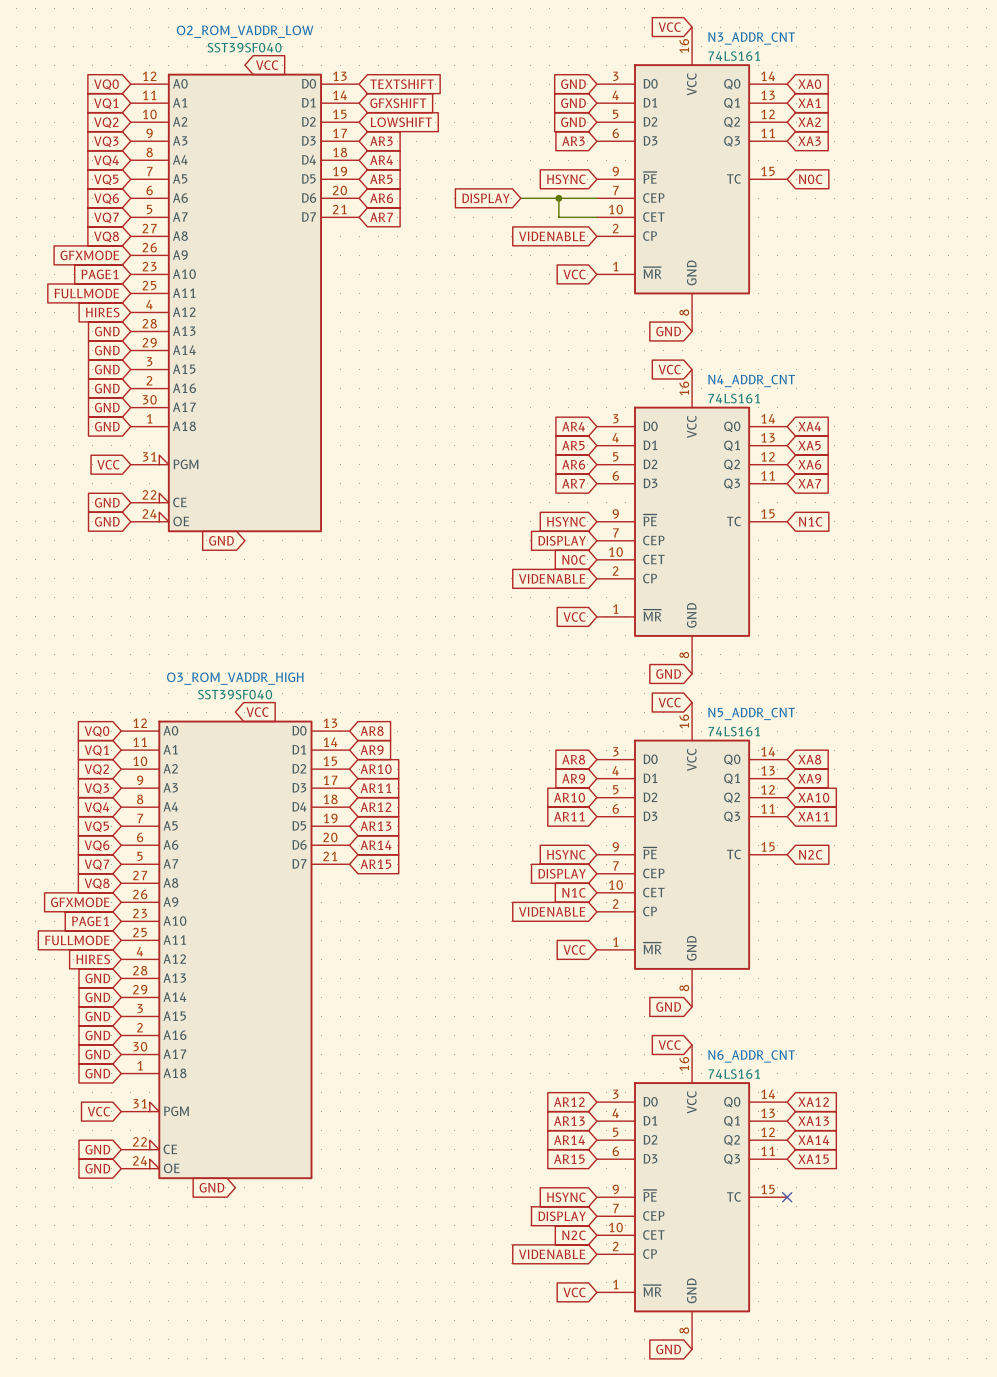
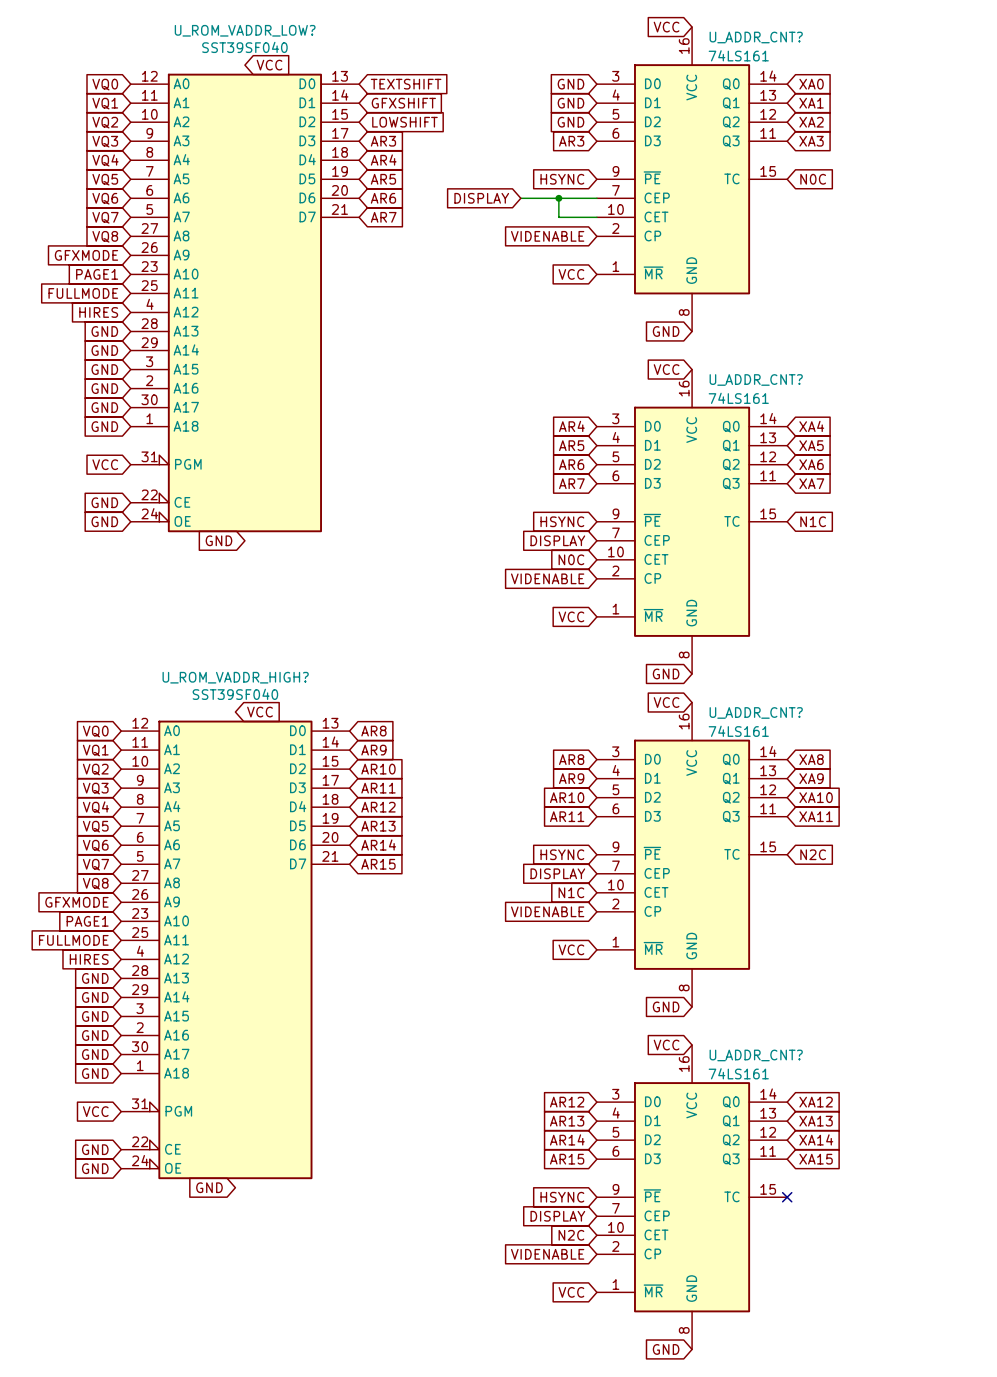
O2_ROM_VADDR_LOW name: O2_ROM_VADDR_LOW (245, 31) -> U_ROM_VADDR_LOW? (245, 30)
N3_ADDR_CNT name: N3_ADDR_CNT (751, 38) -> U_ADDR_CNT? (756, 37)
N4_ADDR_CNT name: N4_ADDR_CNT (751, 380) -> U_ADDR_CNT? (756, 379)
O3_ROM_VADDR_HIGH name: O3_ROM_VADDR_HIGH (235, 678) -> U_ROM_VADDR_HIGH? (235, 677)
N5_ADDR_CNT name: N5_ADDR_CNT (751, 713) -> U_ADDR_CNT? (756, 712)
N6_ADDR_CNT name: N6_ADDR_CNT (751, 1056) -> U_ADDR_CNT? (756, 1055)

